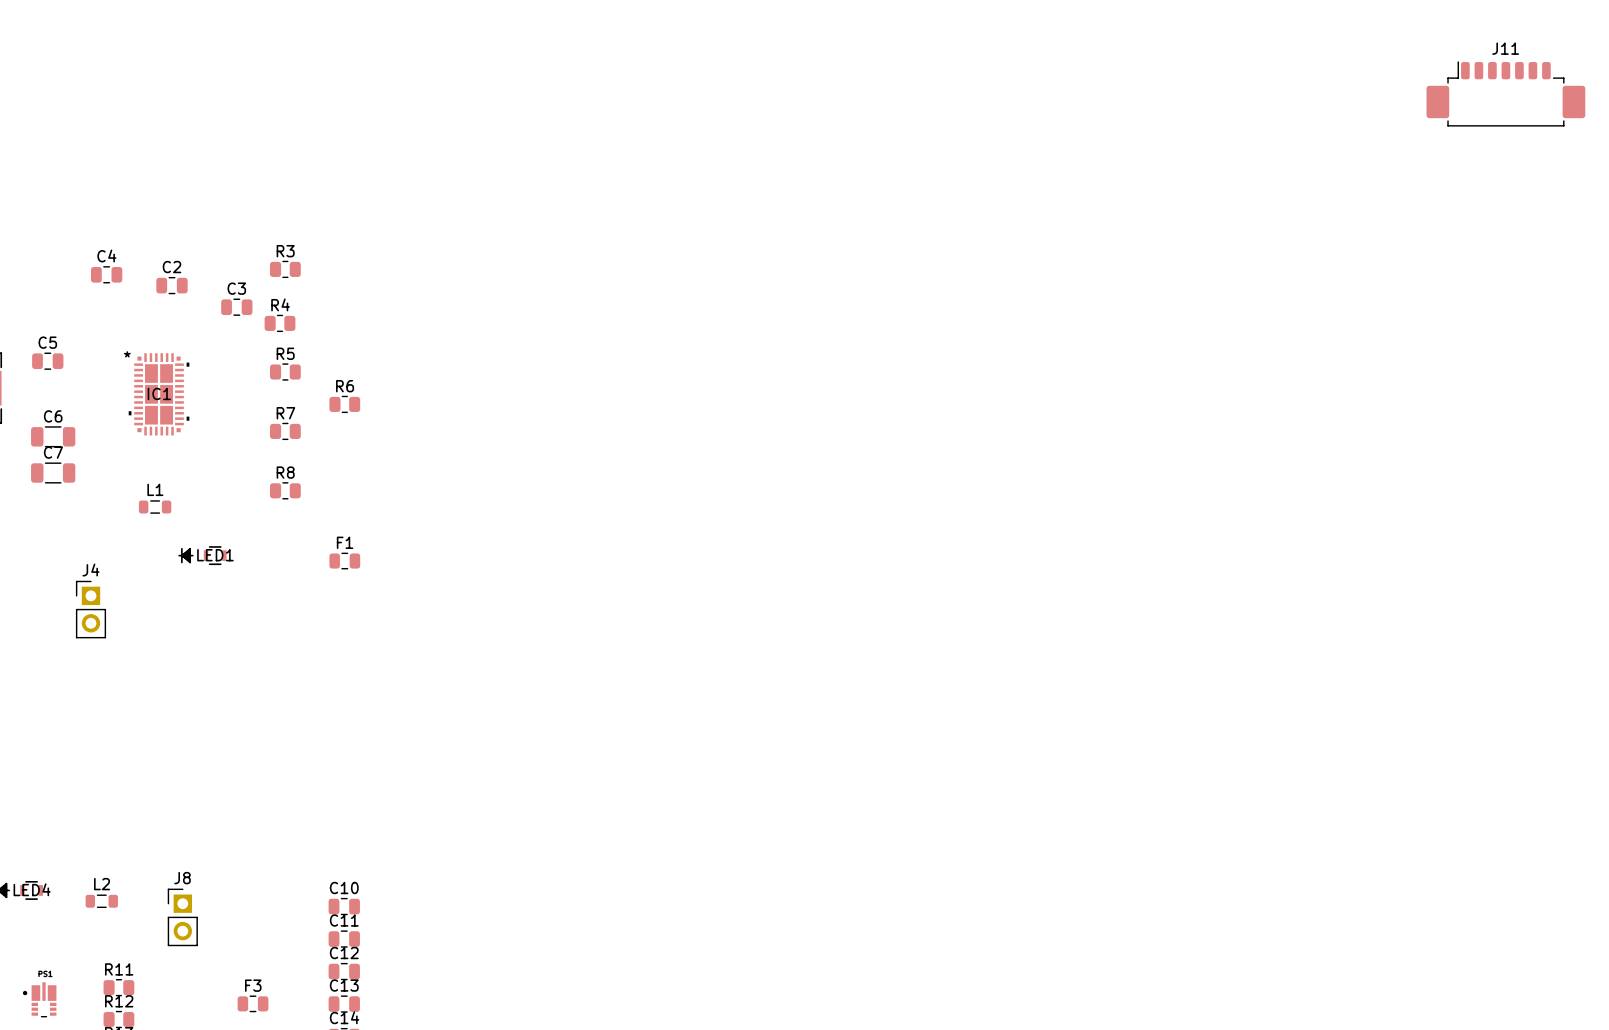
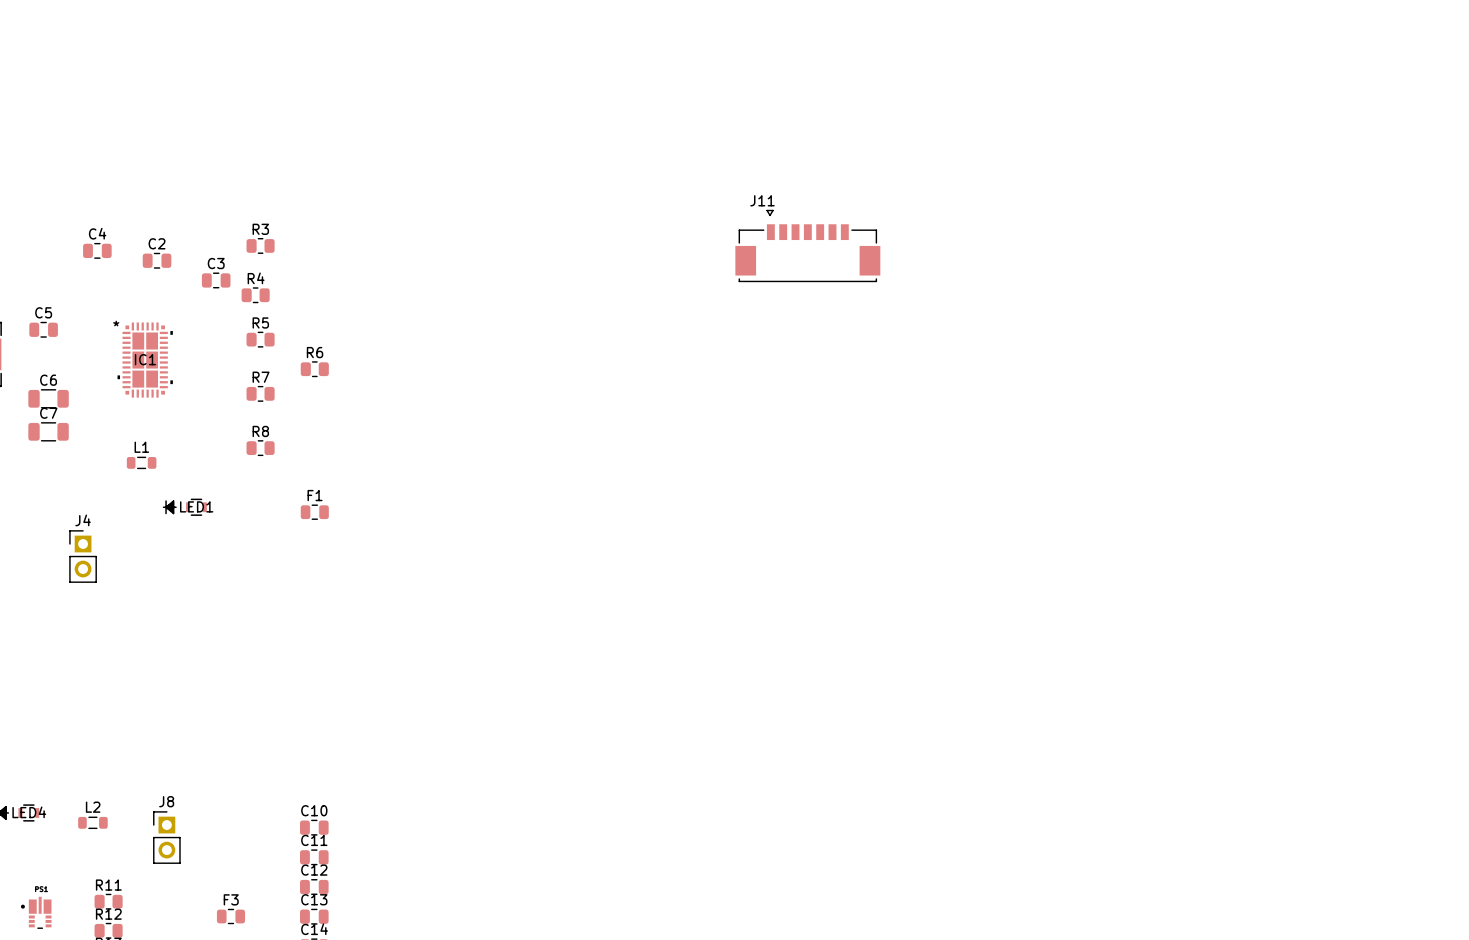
J11 name position: J11 (1505, 48) -> J11 (762, 200)
J11 footprint: [1426, 61, 1586, 127] -> [735, 209, 881, 283]

